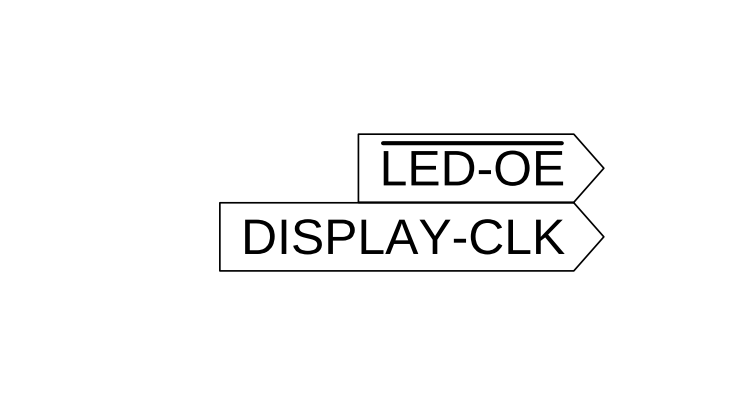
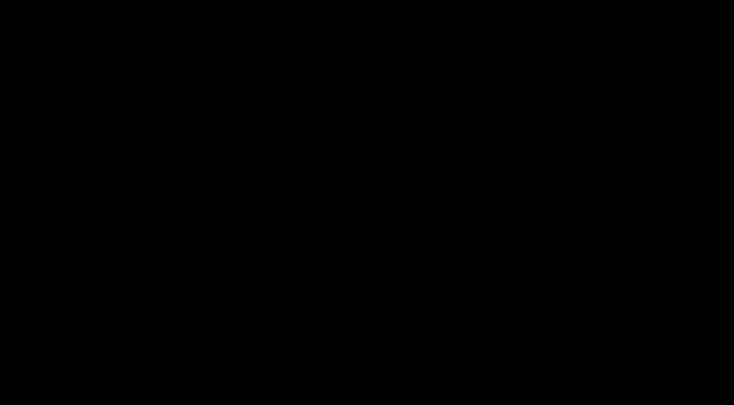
global label: ~{LED-OE} (473, 164) -> none
global label: DISPLAY-CLK (404, 236) -> none

